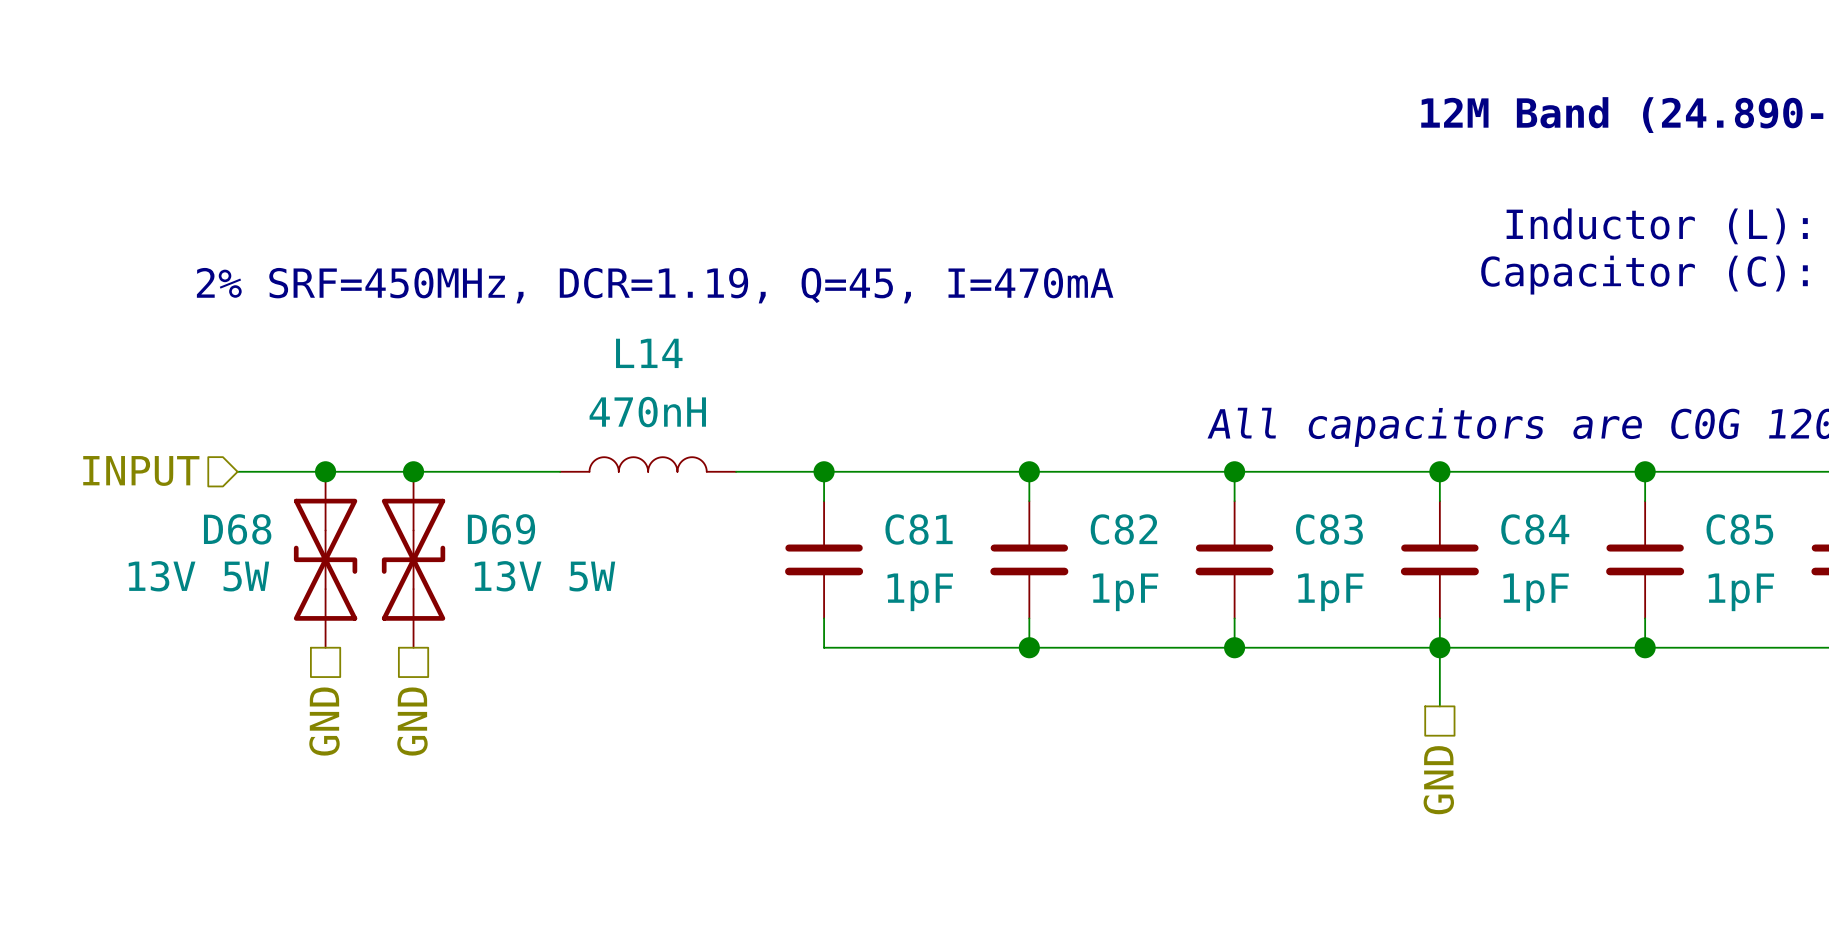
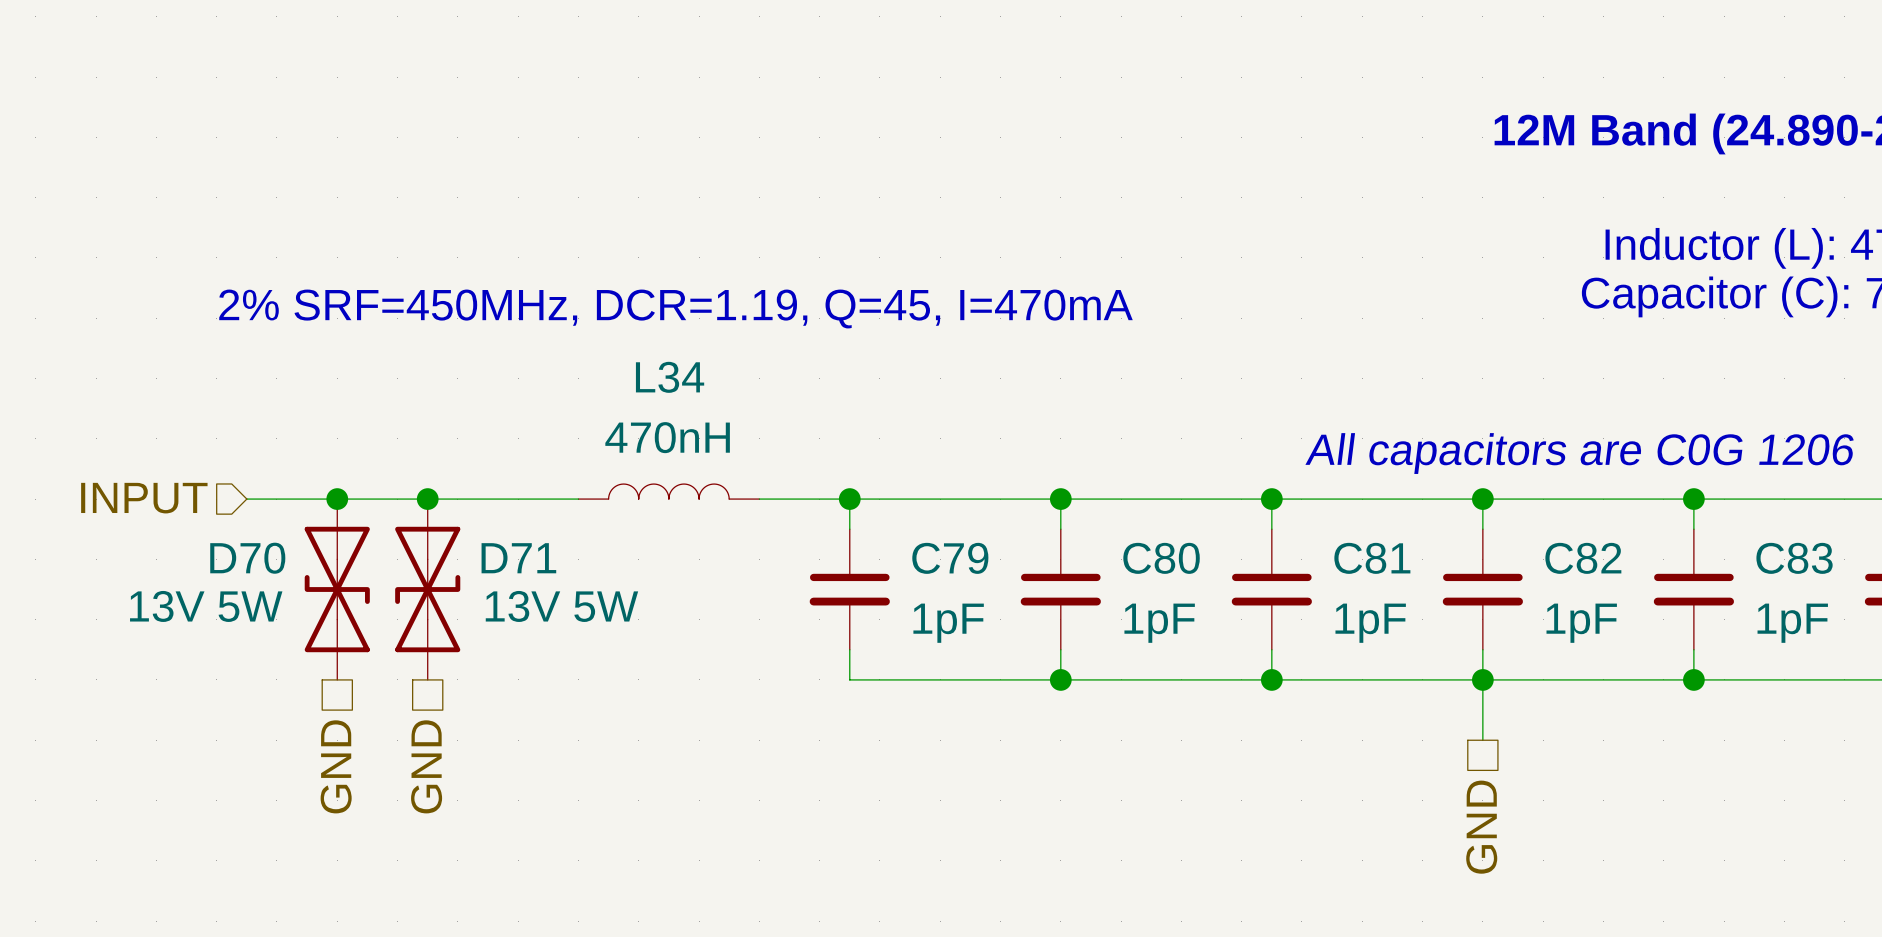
L14 name: L14 (649, 353) -> L34 (670, 377)
D68 name: D68 (237, 529) -> D70 (247, 558)
D69 name: D69 (501, 529) -> D71 (518, 558)
C81 name: C81 (919, 529) -> C79 (950, 558)
C82 name: C82 (1123, 529) -> C80 (1161, 558)
C83 name: C83 (1329, 529) -> C81 (1372, 558)
C84 name: C84 (1535, 529) -> C82 (1583, 558)
C85 name: C85 (1739, 529) -> C83 (1794, 558)

